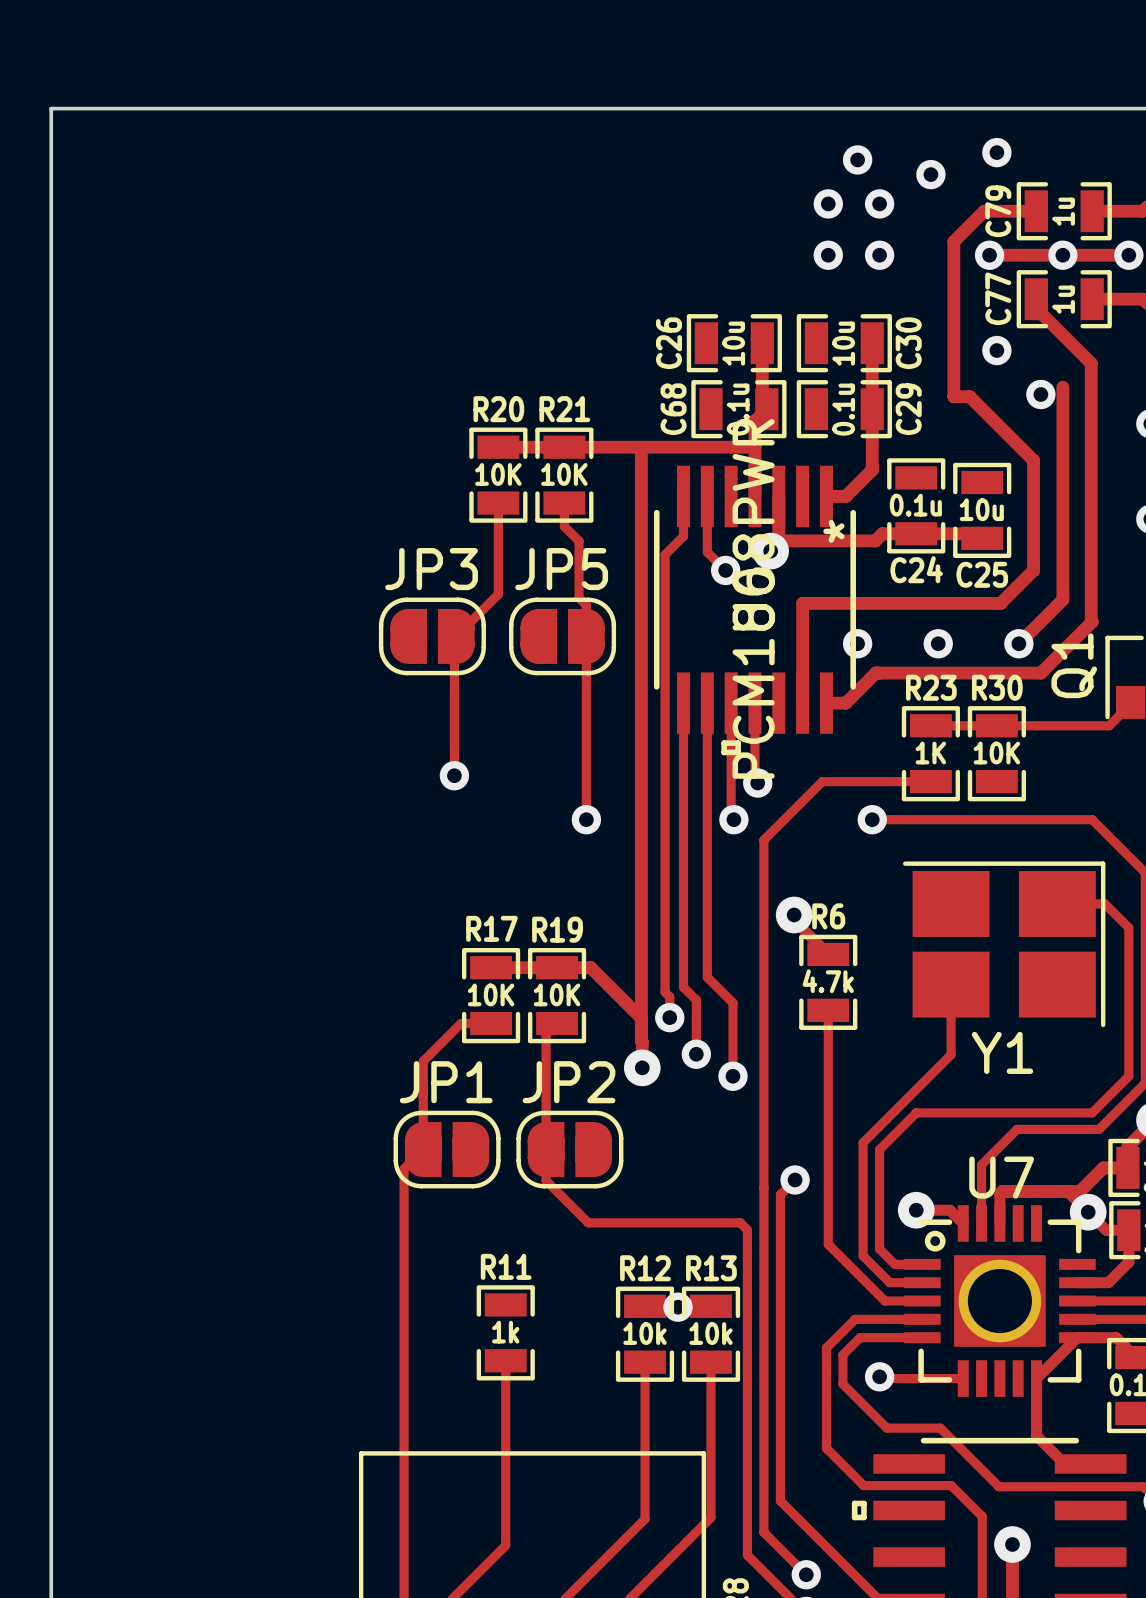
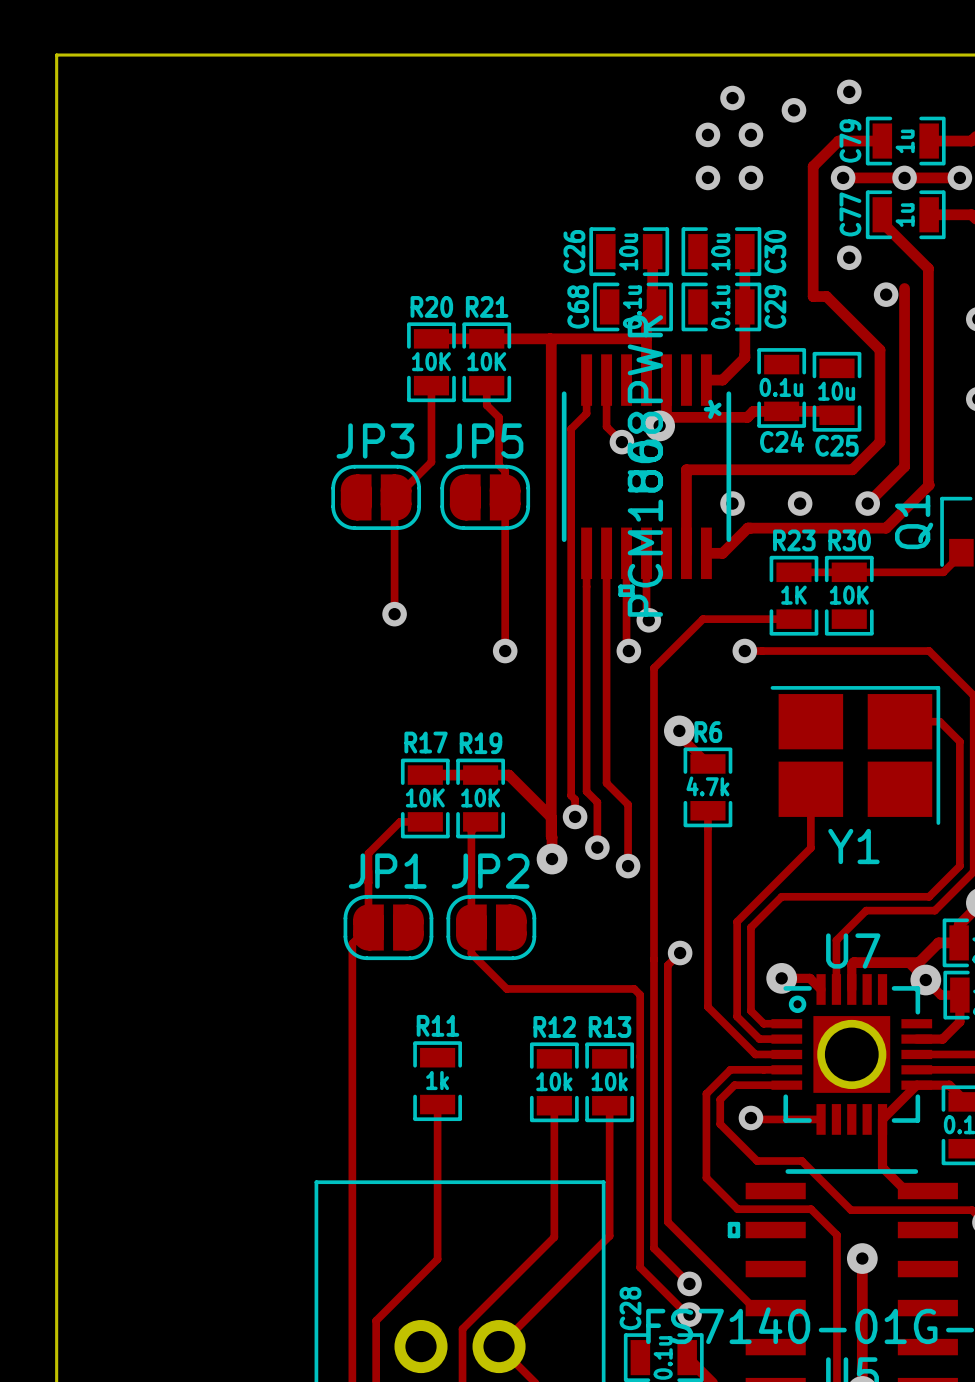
via: (678, 1307) -> none

